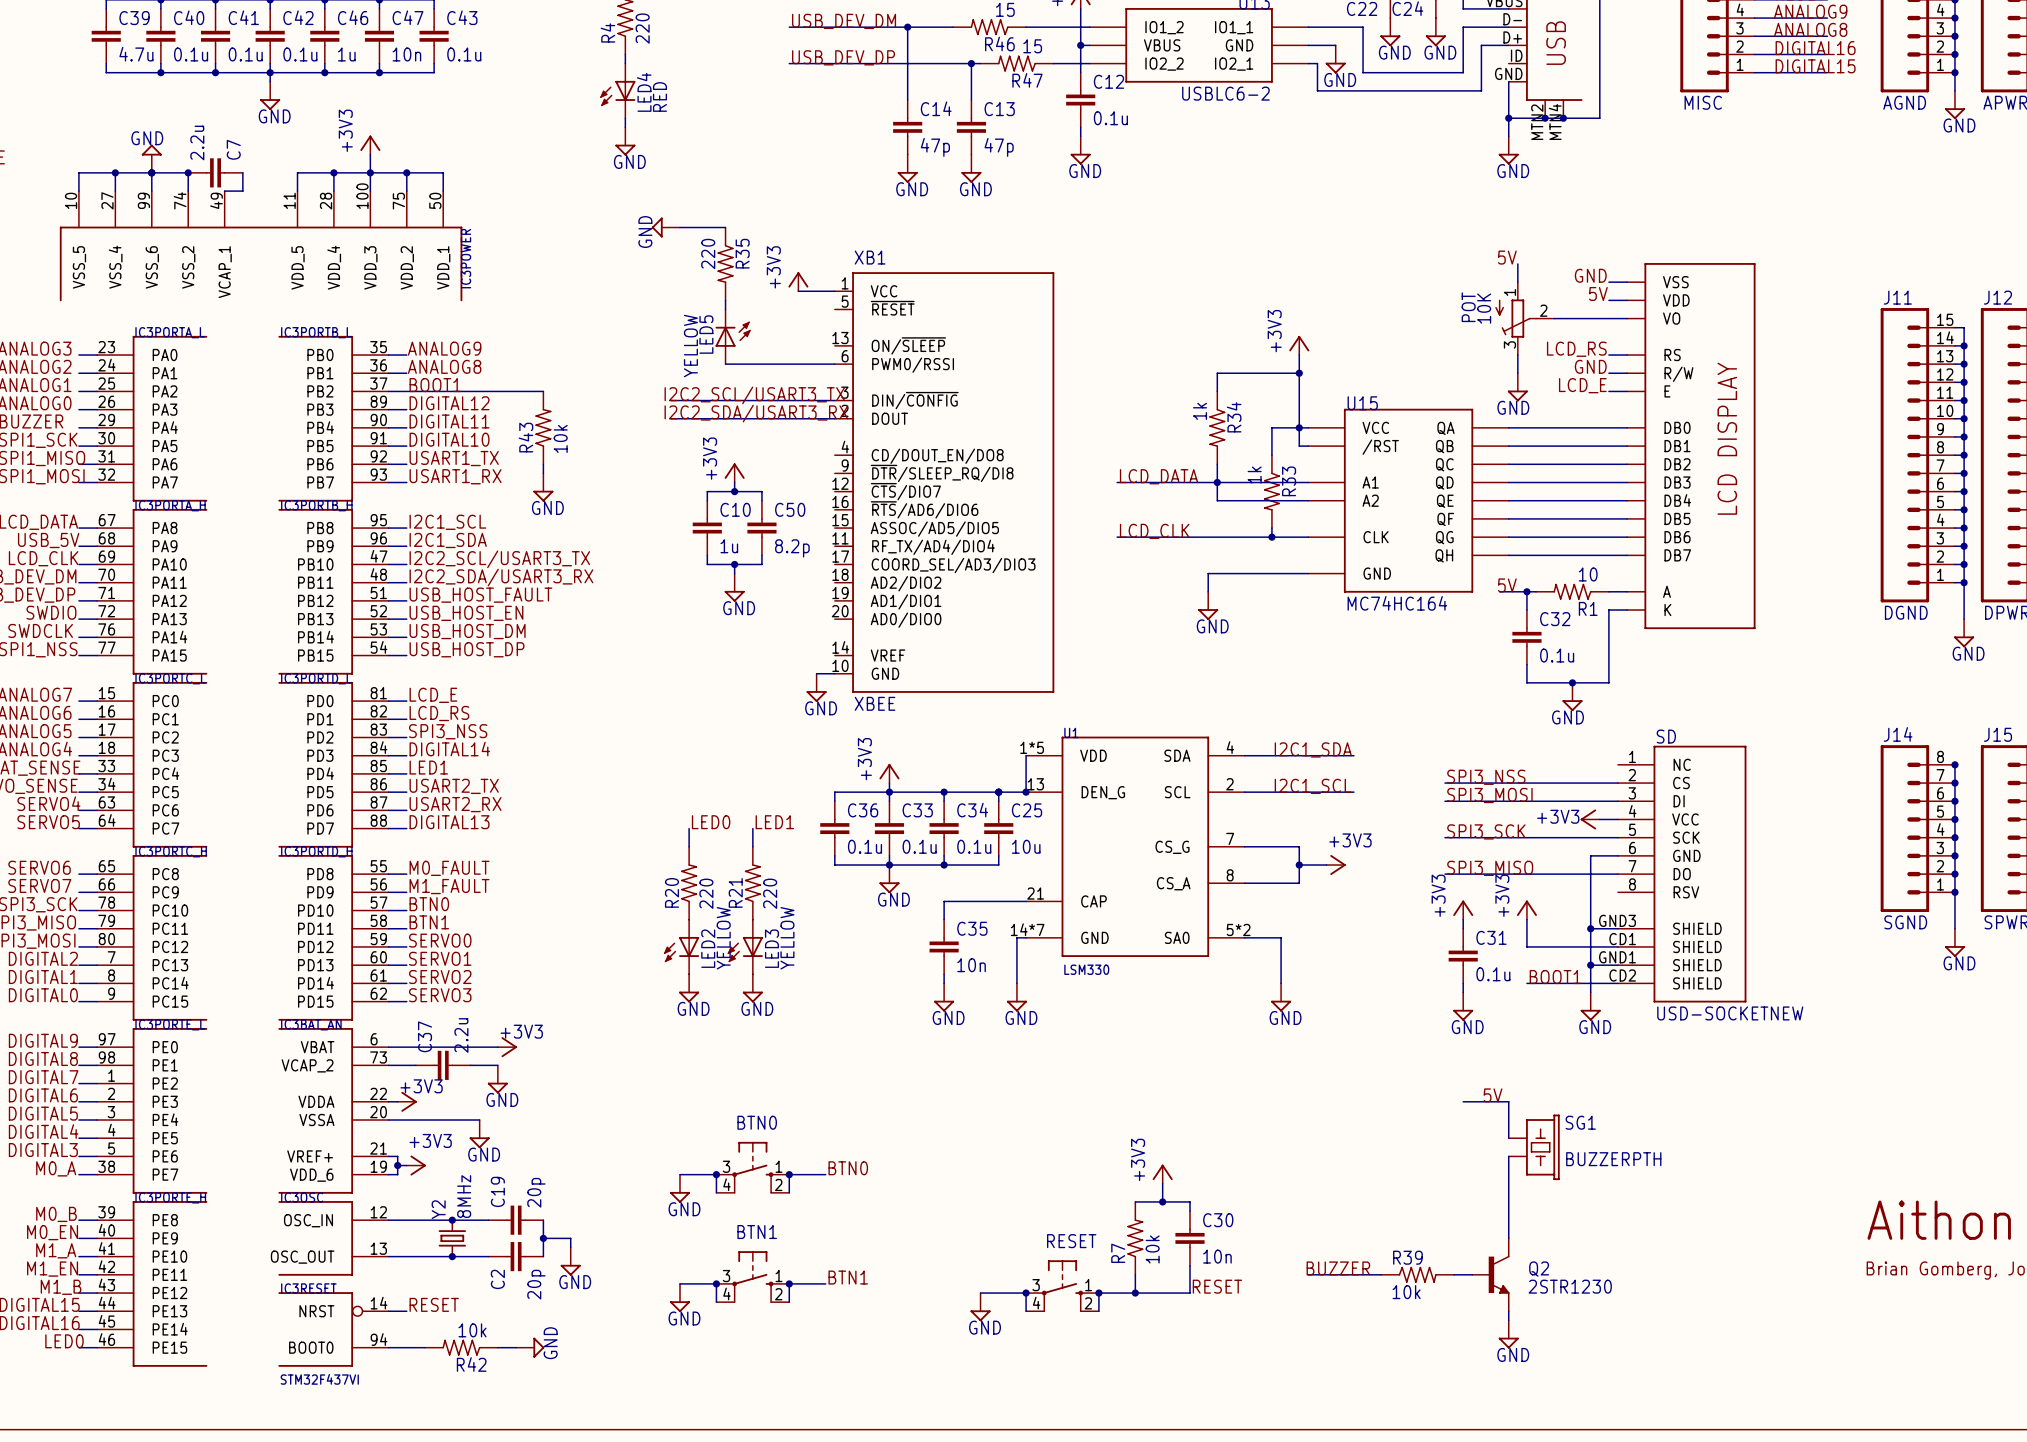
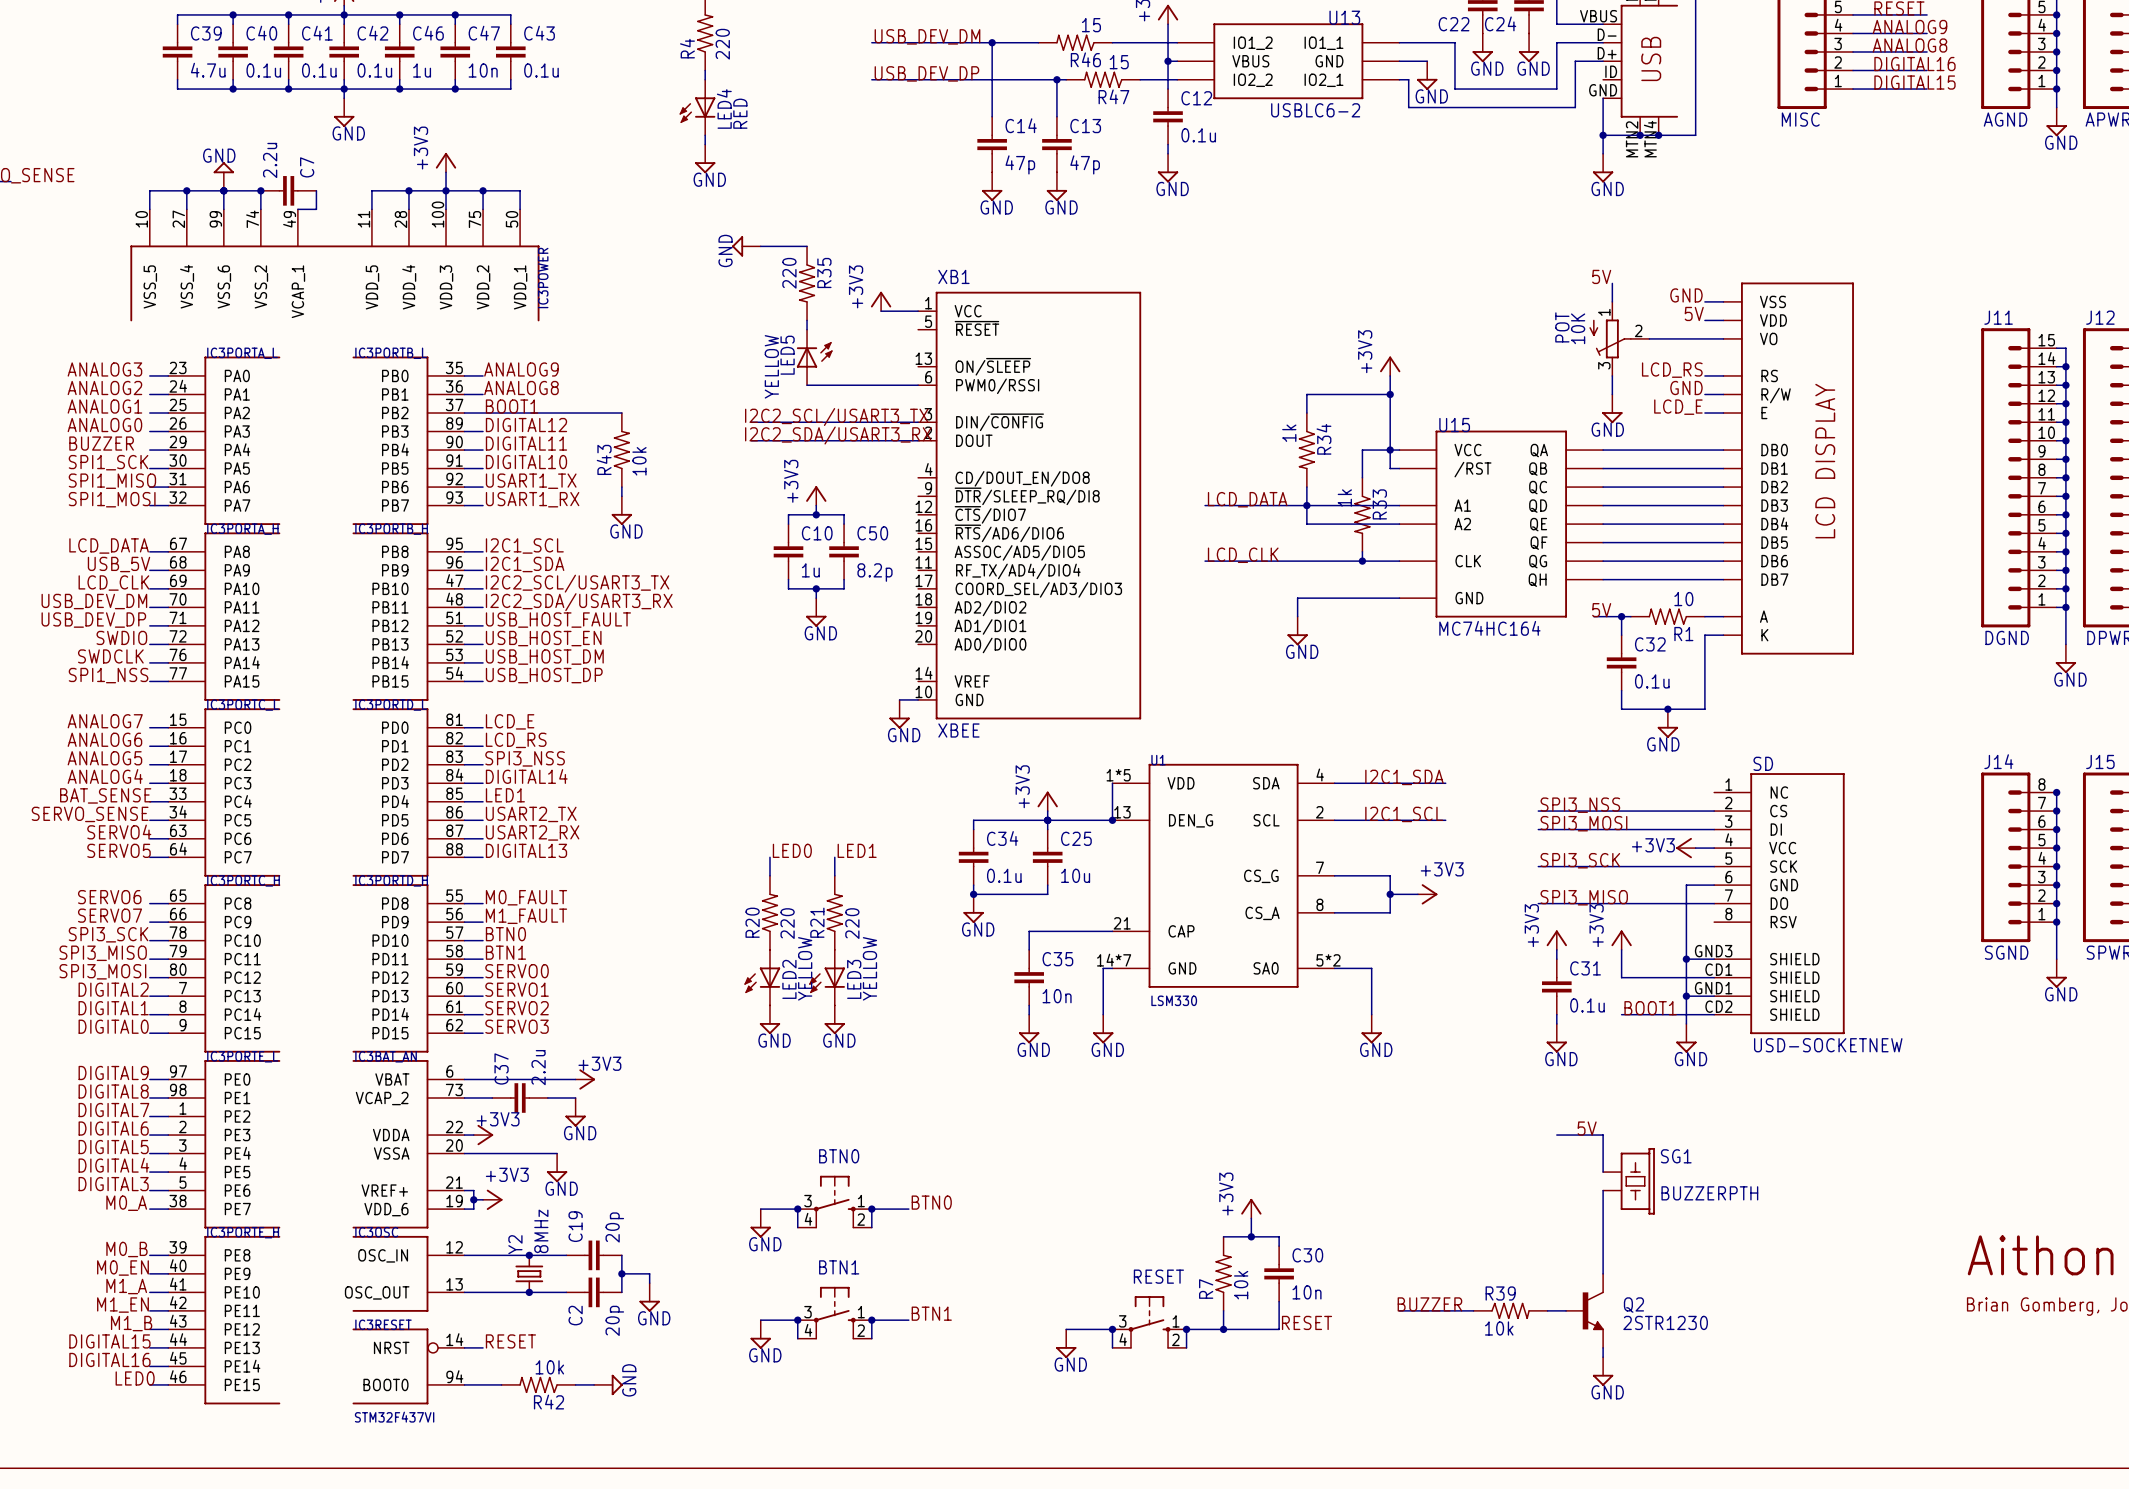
power symbol position: +3V3 (889, 773) -> +3V3 (1047, 801)
wire: (889, 783) (889, 792) (834, 792) (834, 801) -> none
wire: none -> (1047, 811) (1047, 829)
junction: (889, 792) -> none
wire: (944, 792) (944, 801) -> none
junction: (944, 792) -> none
junction: none -> (1047, 820)
wire: (998, 792) (998, 801) -> none
junction: (998, 792) -> none
C33 name: C33 (917, 810) -> C34 (1002, 838)
C36: 0.1u (834, 828) -> none
C34: 0.1u (944, 828) -> none
C25 position: (998, 828) -> (1047, 857)
wire: (834, 855) (834, 865) (889, 865) -> none
wire: (944, 855) (944, 865) -> none
wire: (998, 855) (998, 865) (962, 865) -> (1047, 885) (1047, 894)
junction: (944, 865) -> none

